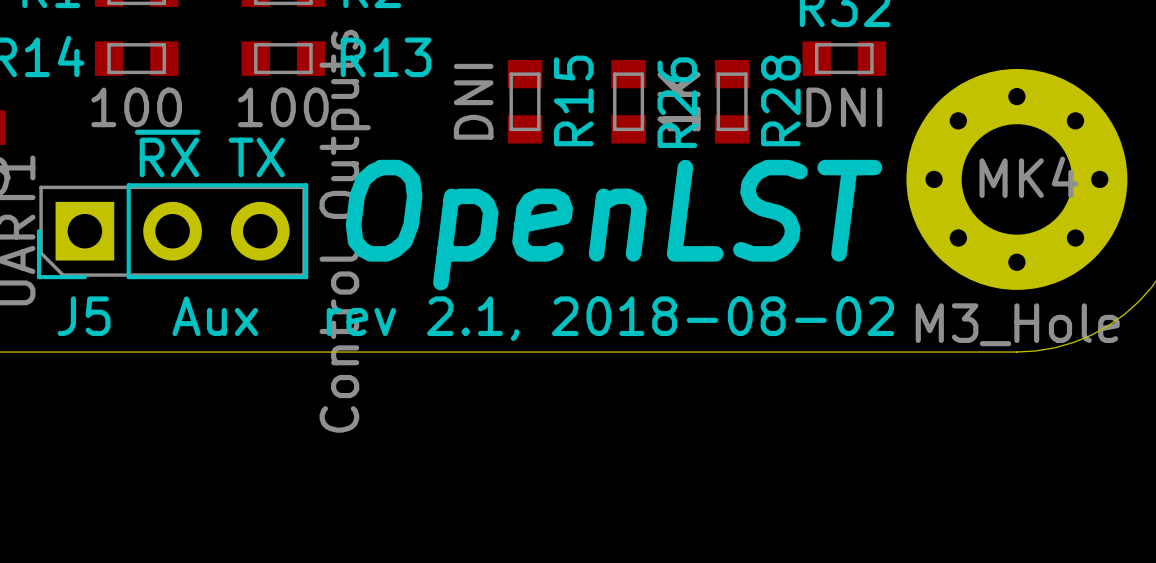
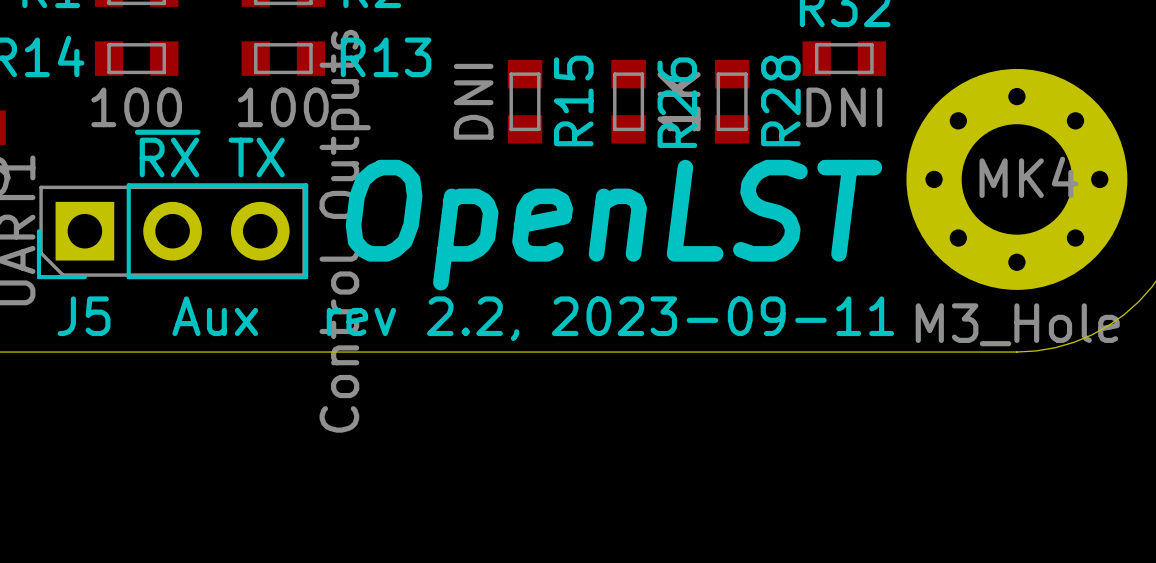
text: rev 2.1, 2018-08-02 (610, 318) -> rev 2.2, 2023-09-11 (610, 318)

